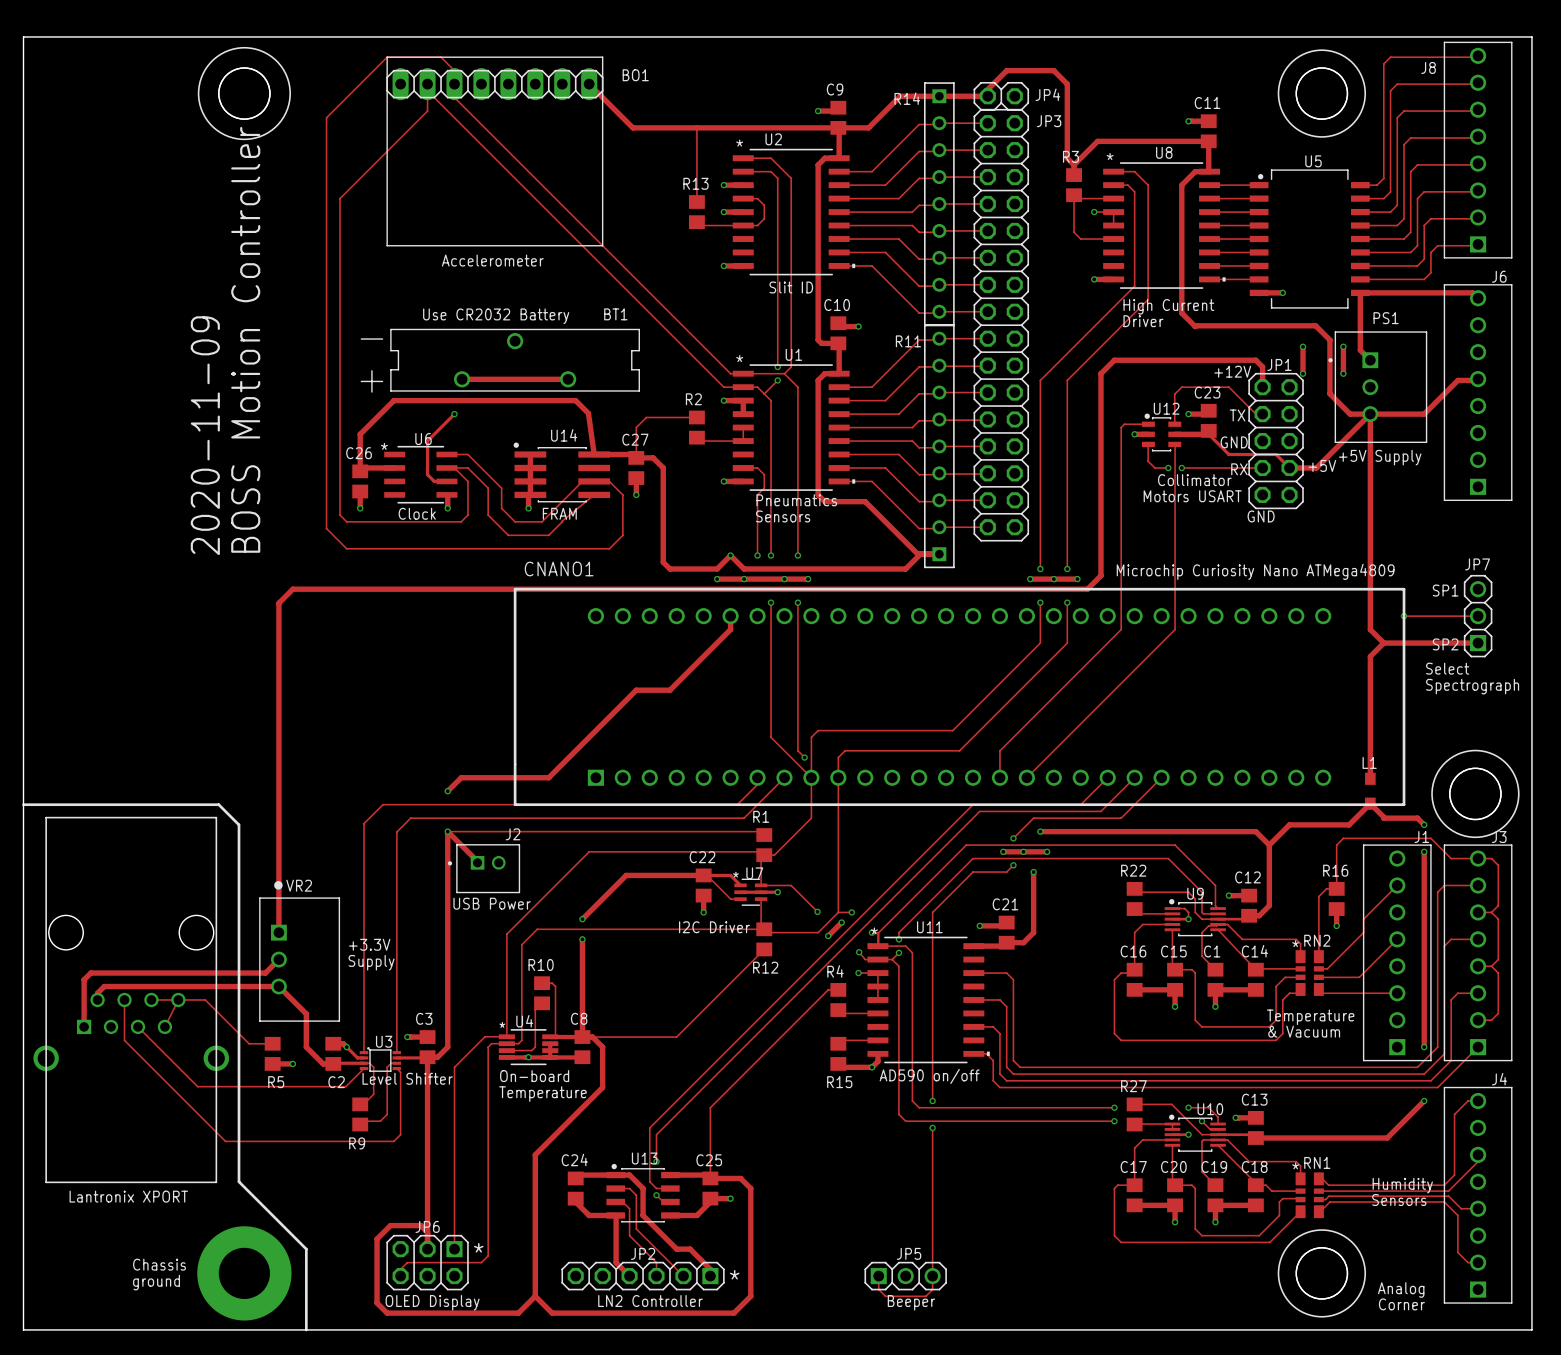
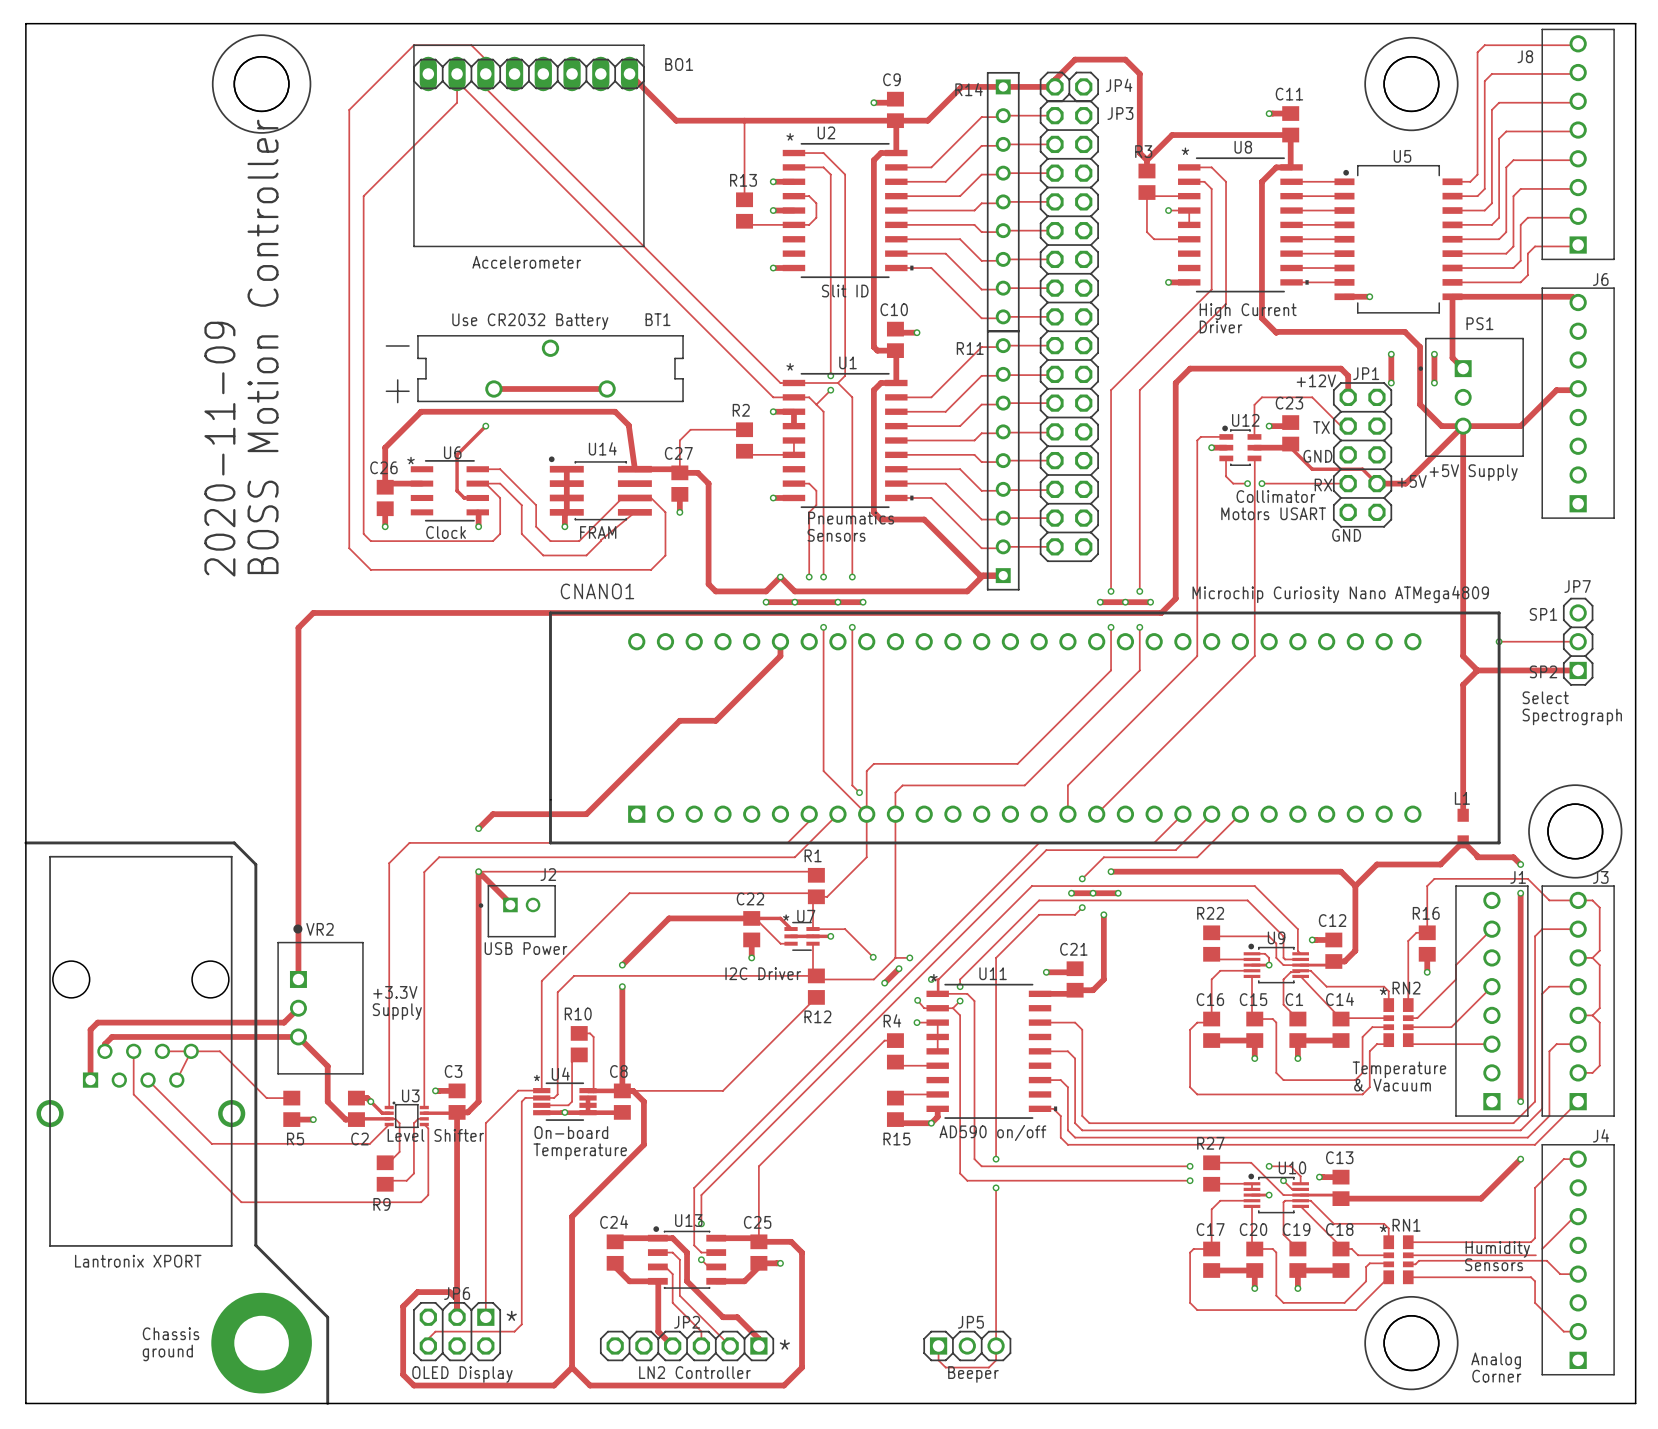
track: (1467, 1100) (1454, 1114) (1454, 1175) -> none
track: (1478, 1154) (1478, 1161) (1448, 1191) (1438, 1191) -> (1578, 1216) (1574, 1216) (1553, 1238)
track: (1322, 1178) (1328, 1185) (1444, 1185) -> (1411, 1242) (1531, 1242) (1535, 1238) (1535, 1187) (1563, 1159) (1567, 1159)
track: (1320, 1211) (1329, 1202) (1444, 1202) (1457, 1215) (1457, 1252) (1467, 1262) -> (1409, 1277) (1531, 1277) (1535, 1281) (1535, 1302) (1563, 1331) (1567, 1331)

